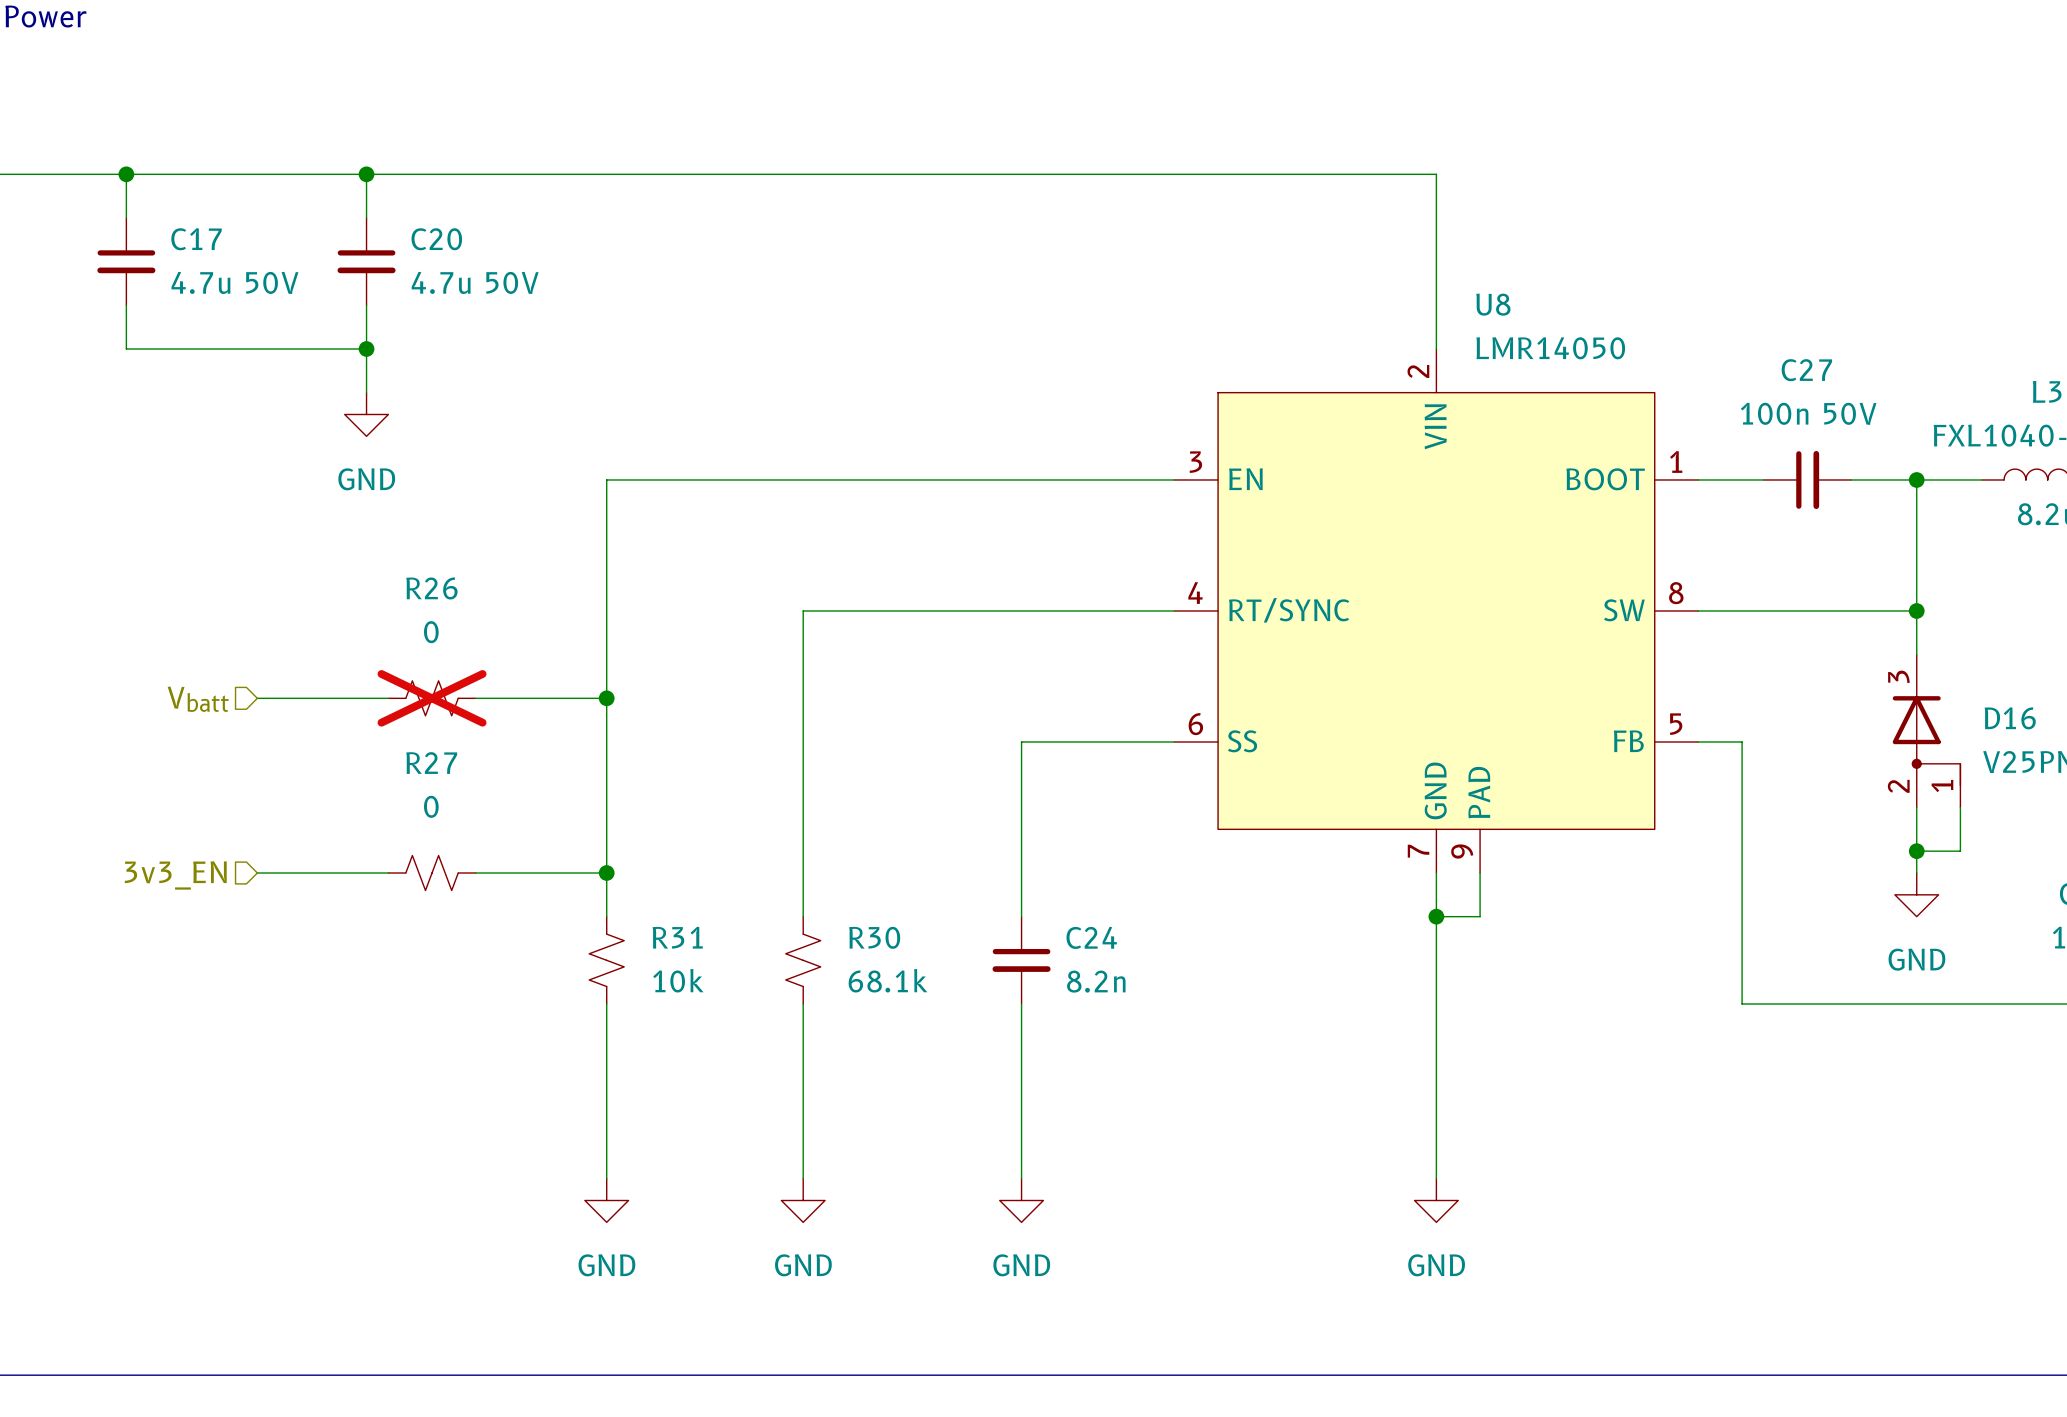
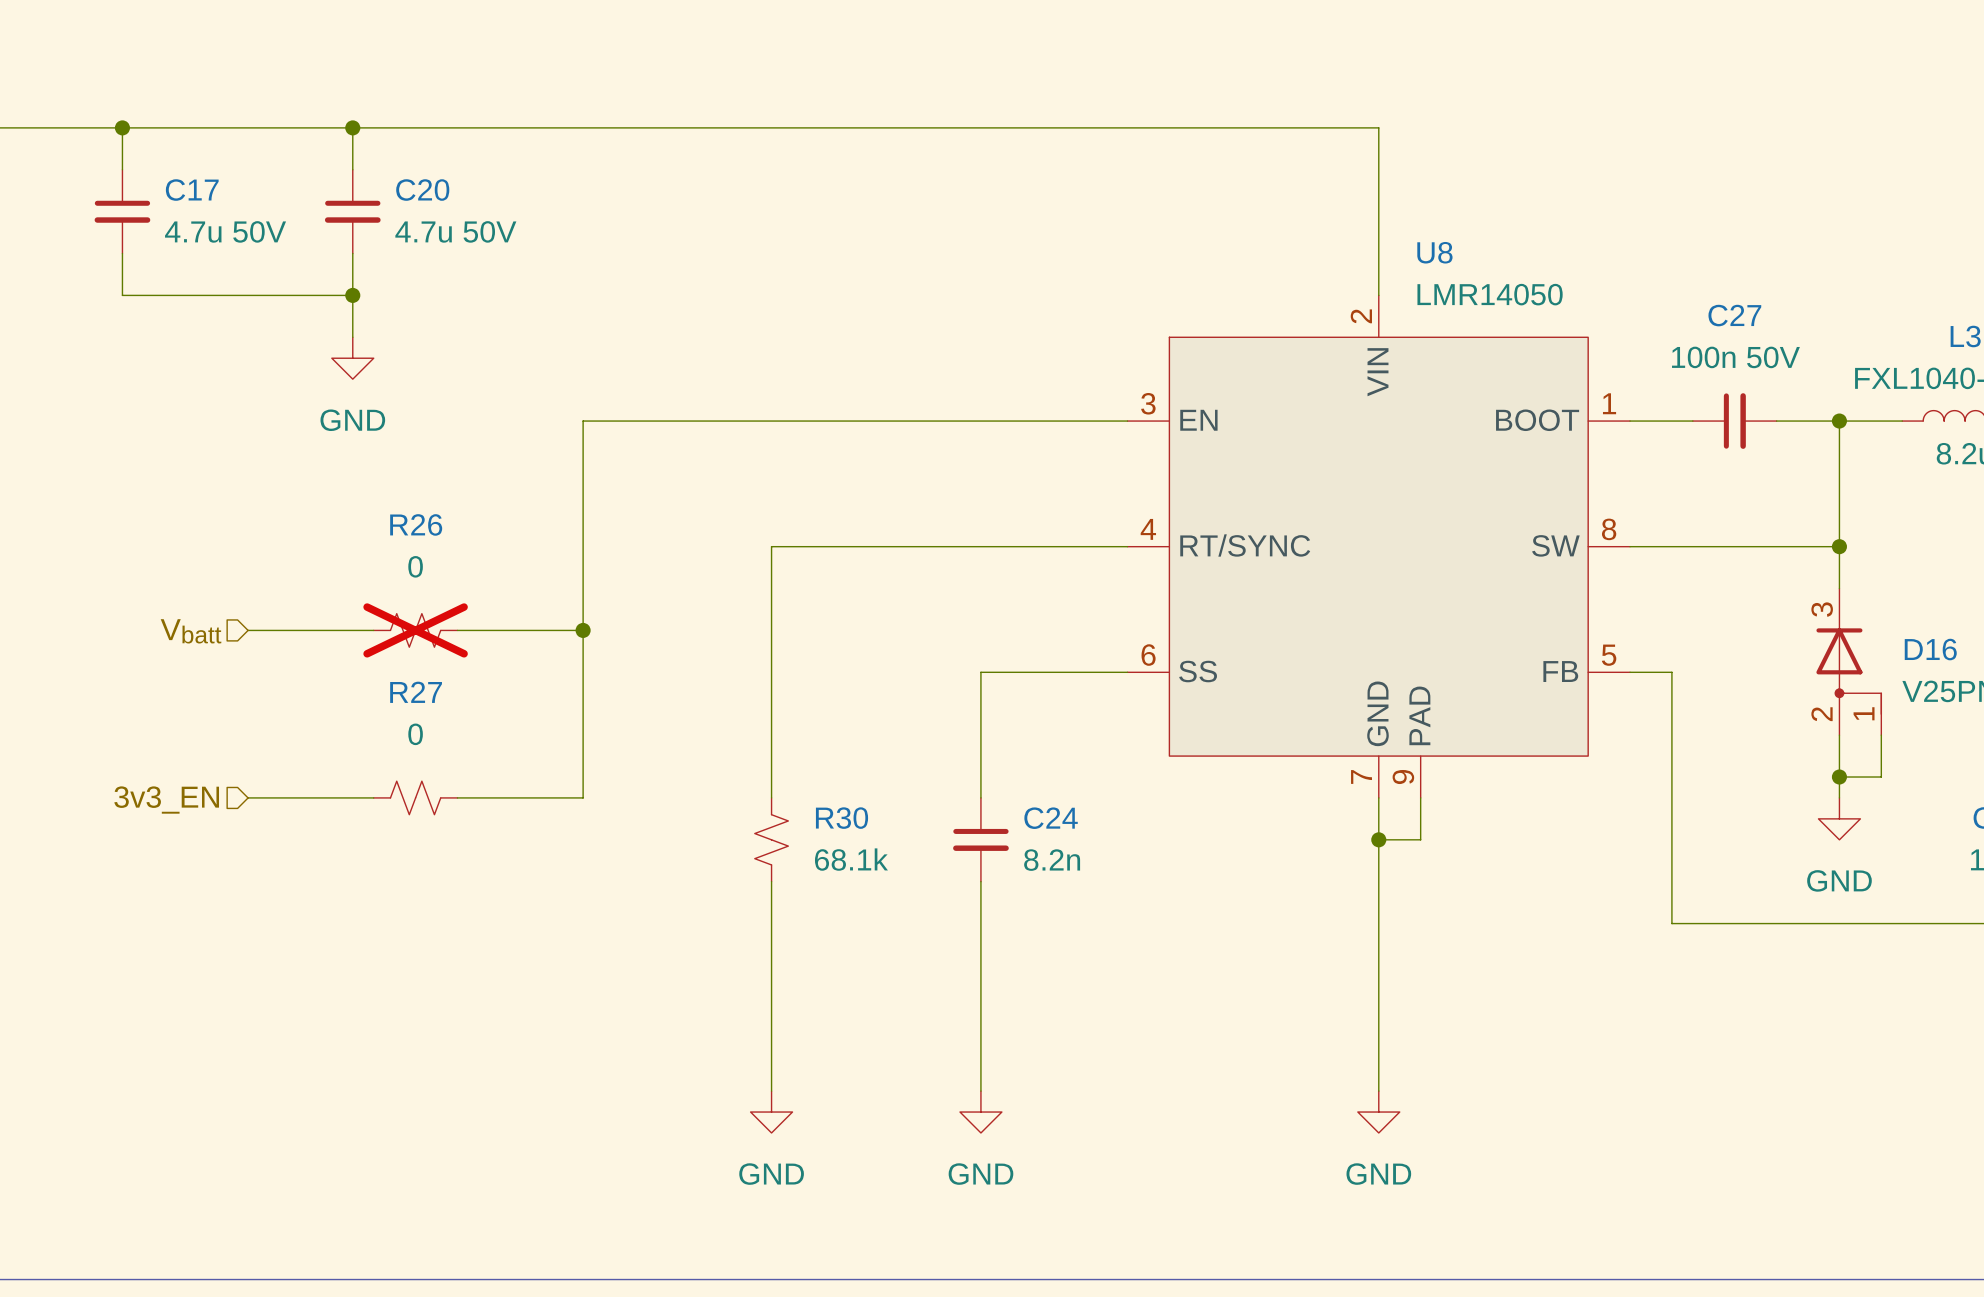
wire: (606, 873) (606, 916) -> none
junction: (606, 873) -> none
wire: (803, 873) (803, 916) -> (771, 881) (771, 923)
R31: 10k (606, 960) -> none
R30 position: (803, 960) -> (771, 839)
C24 position: (1021, 960) -> (980, 839)
wire: (606, 1004) (606, 1178) -> none
power symbol: GND (606, 1200) -> none

